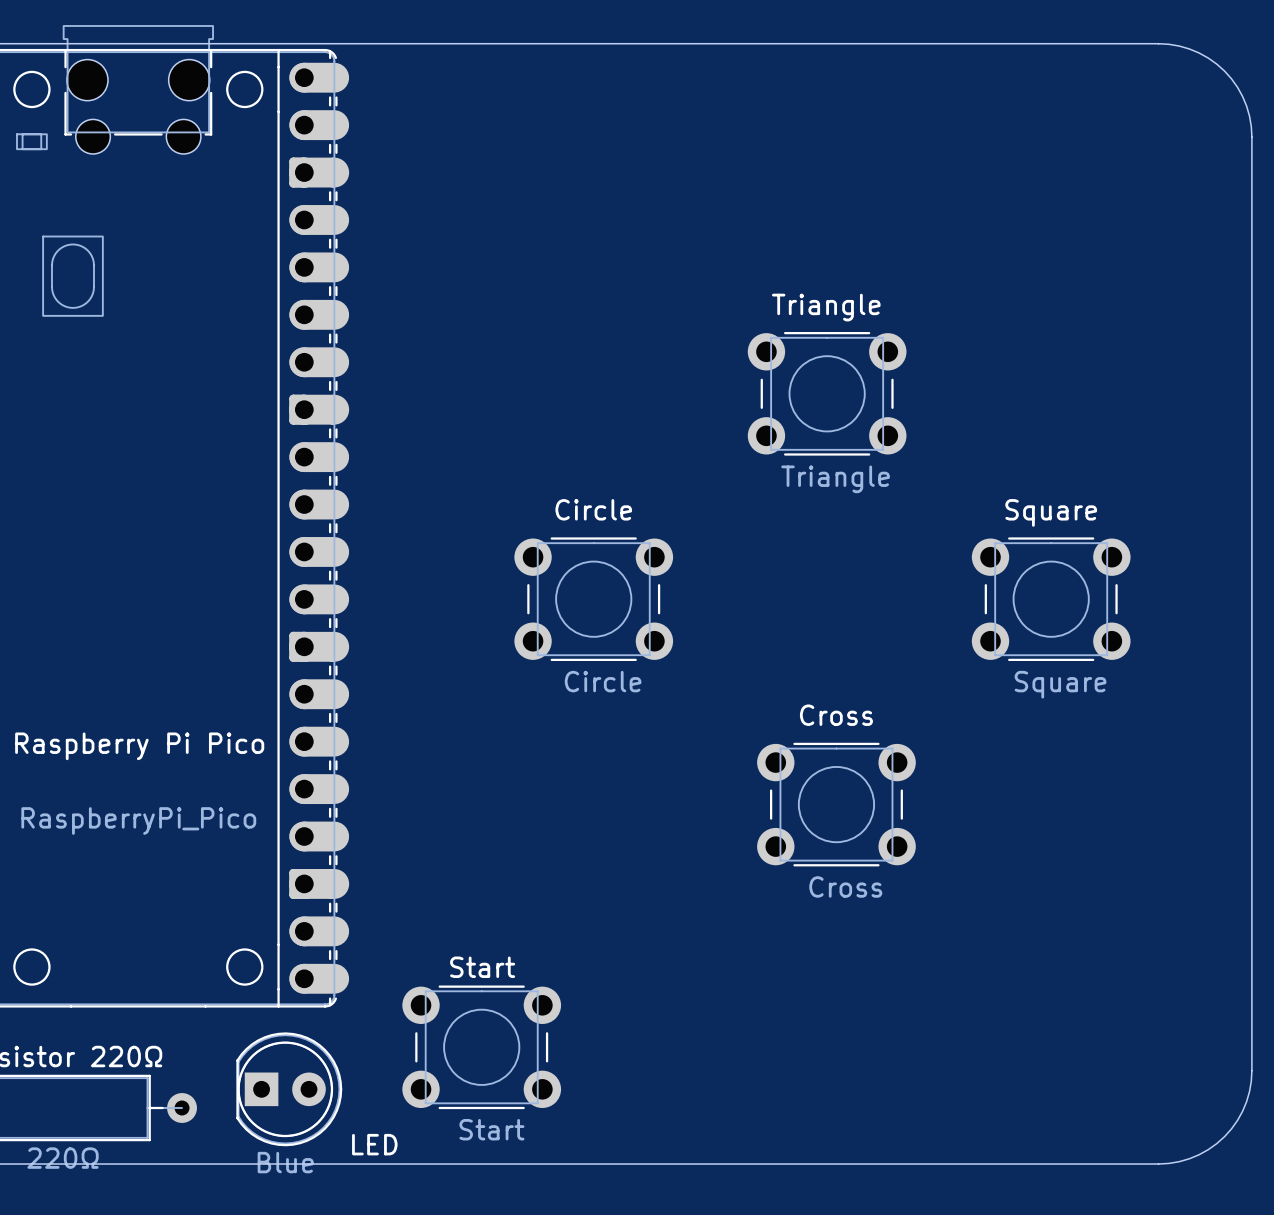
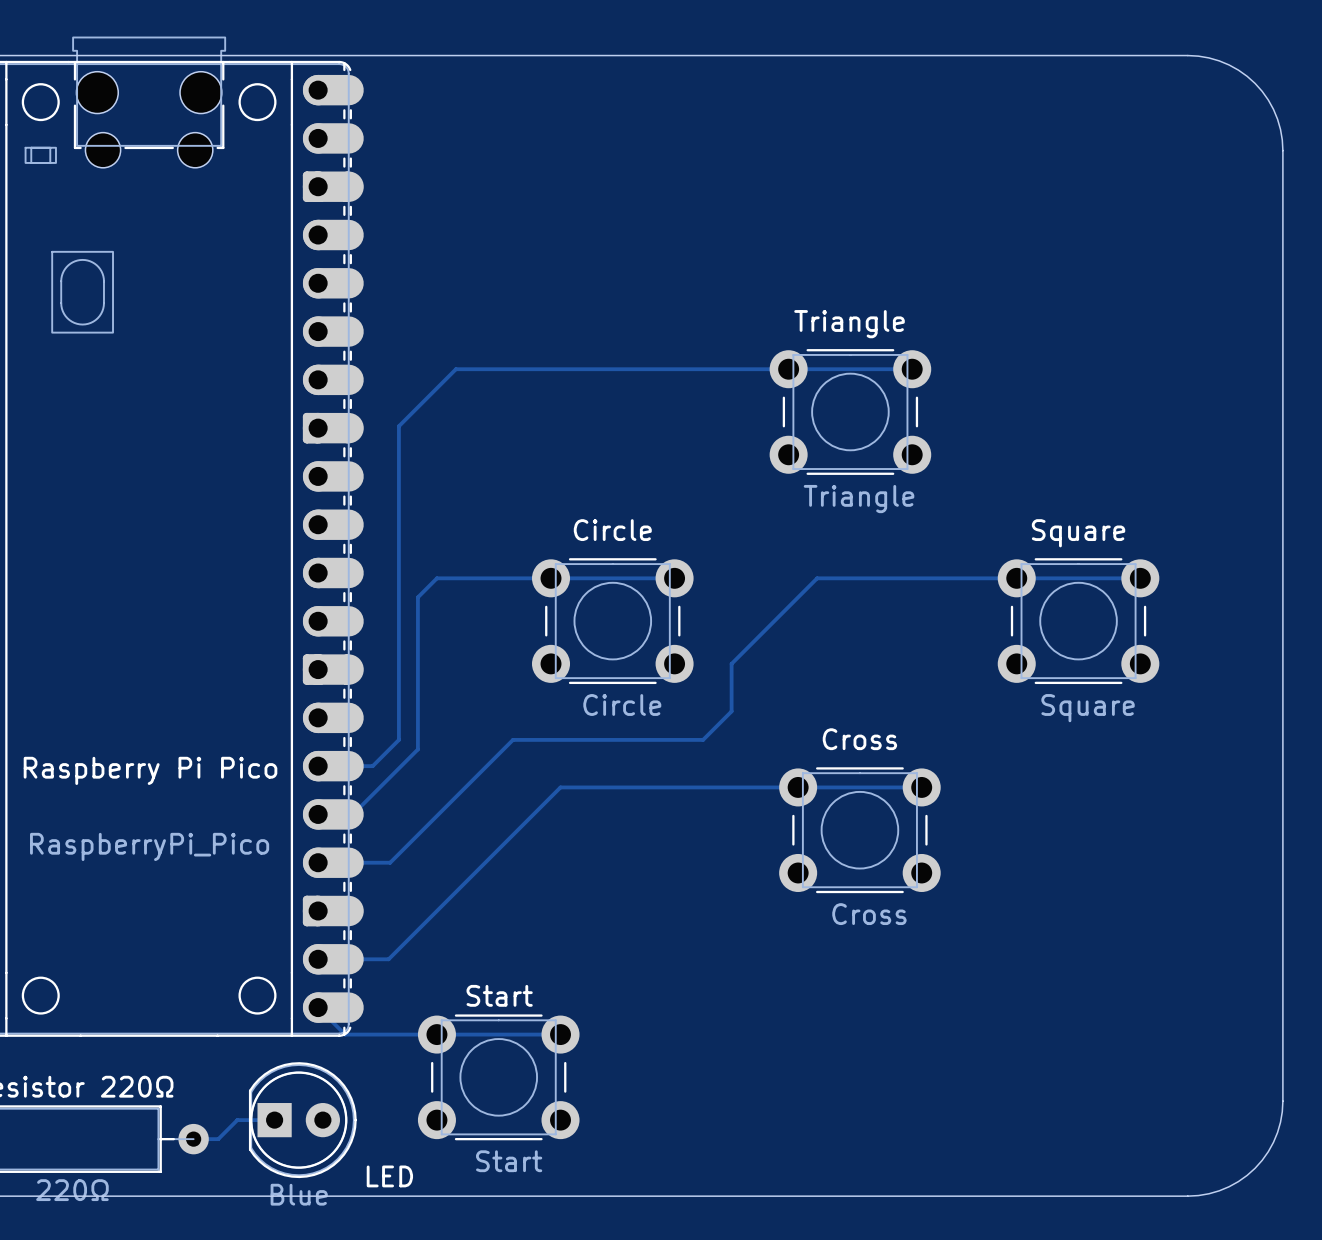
track: none -> (912, 369) (455, 369) (398, 426) (398, 739) (372, 766) (318, 766)
track: none -> (674, 578) (436, 578) (417, 597) (417, 749) (352, 814) (318, 814)
track: none -> (1140, 578) (817, 578) (731, 663) (731, 711) (703, 739) (512, 739) (390, 862) (318, 862)
track: none -> (921, 787) (560, 787) (388, 959) (318, 959)
track: none -> (318, 1007) (345, 1034) (560, 1034)
track: none -> (274, 1120) (237, 1120) (218, 1139) (193, 1139)

